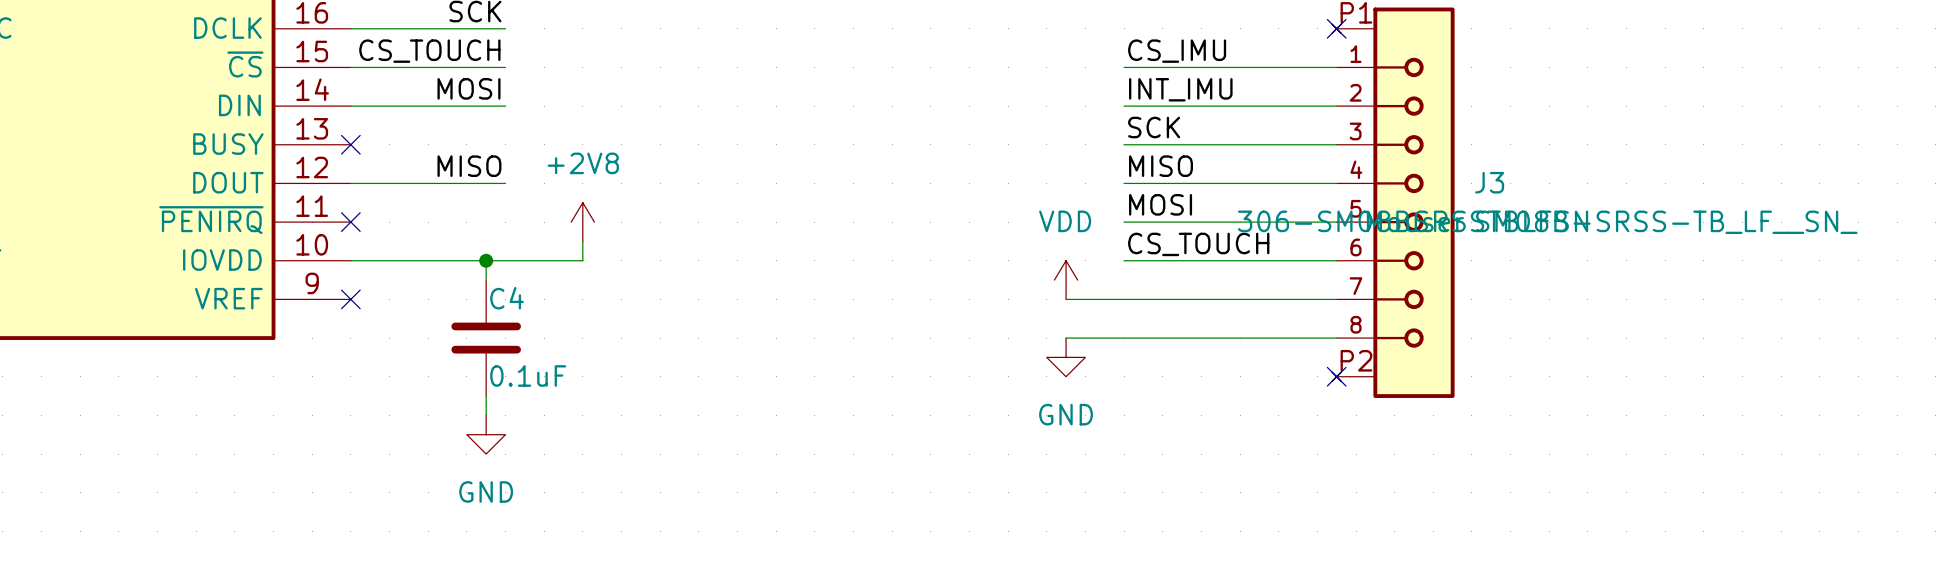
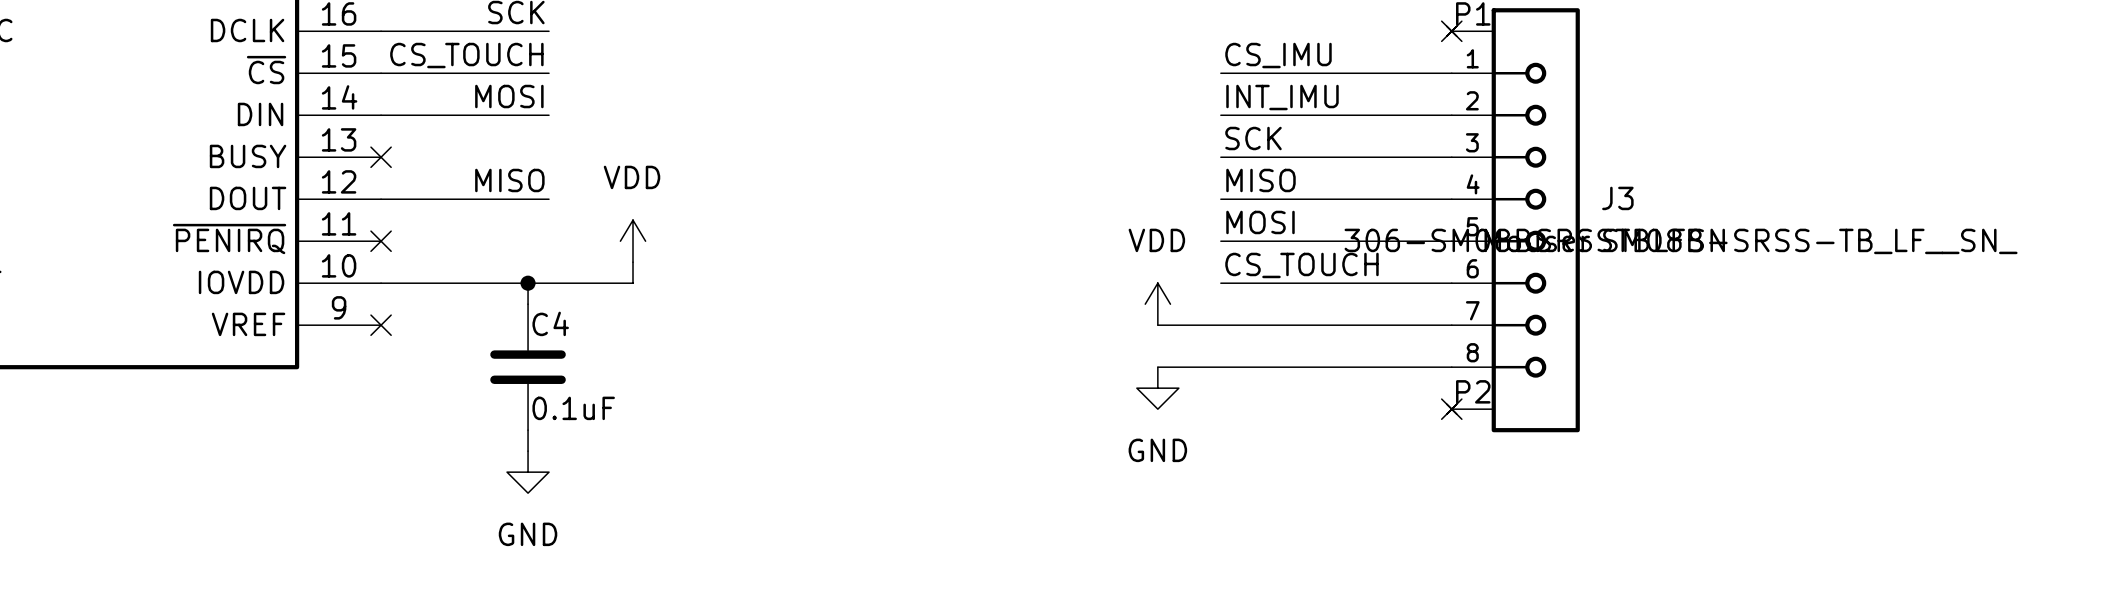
power symbol: +2V8 (582, 222) -> VDD (633, 241)

